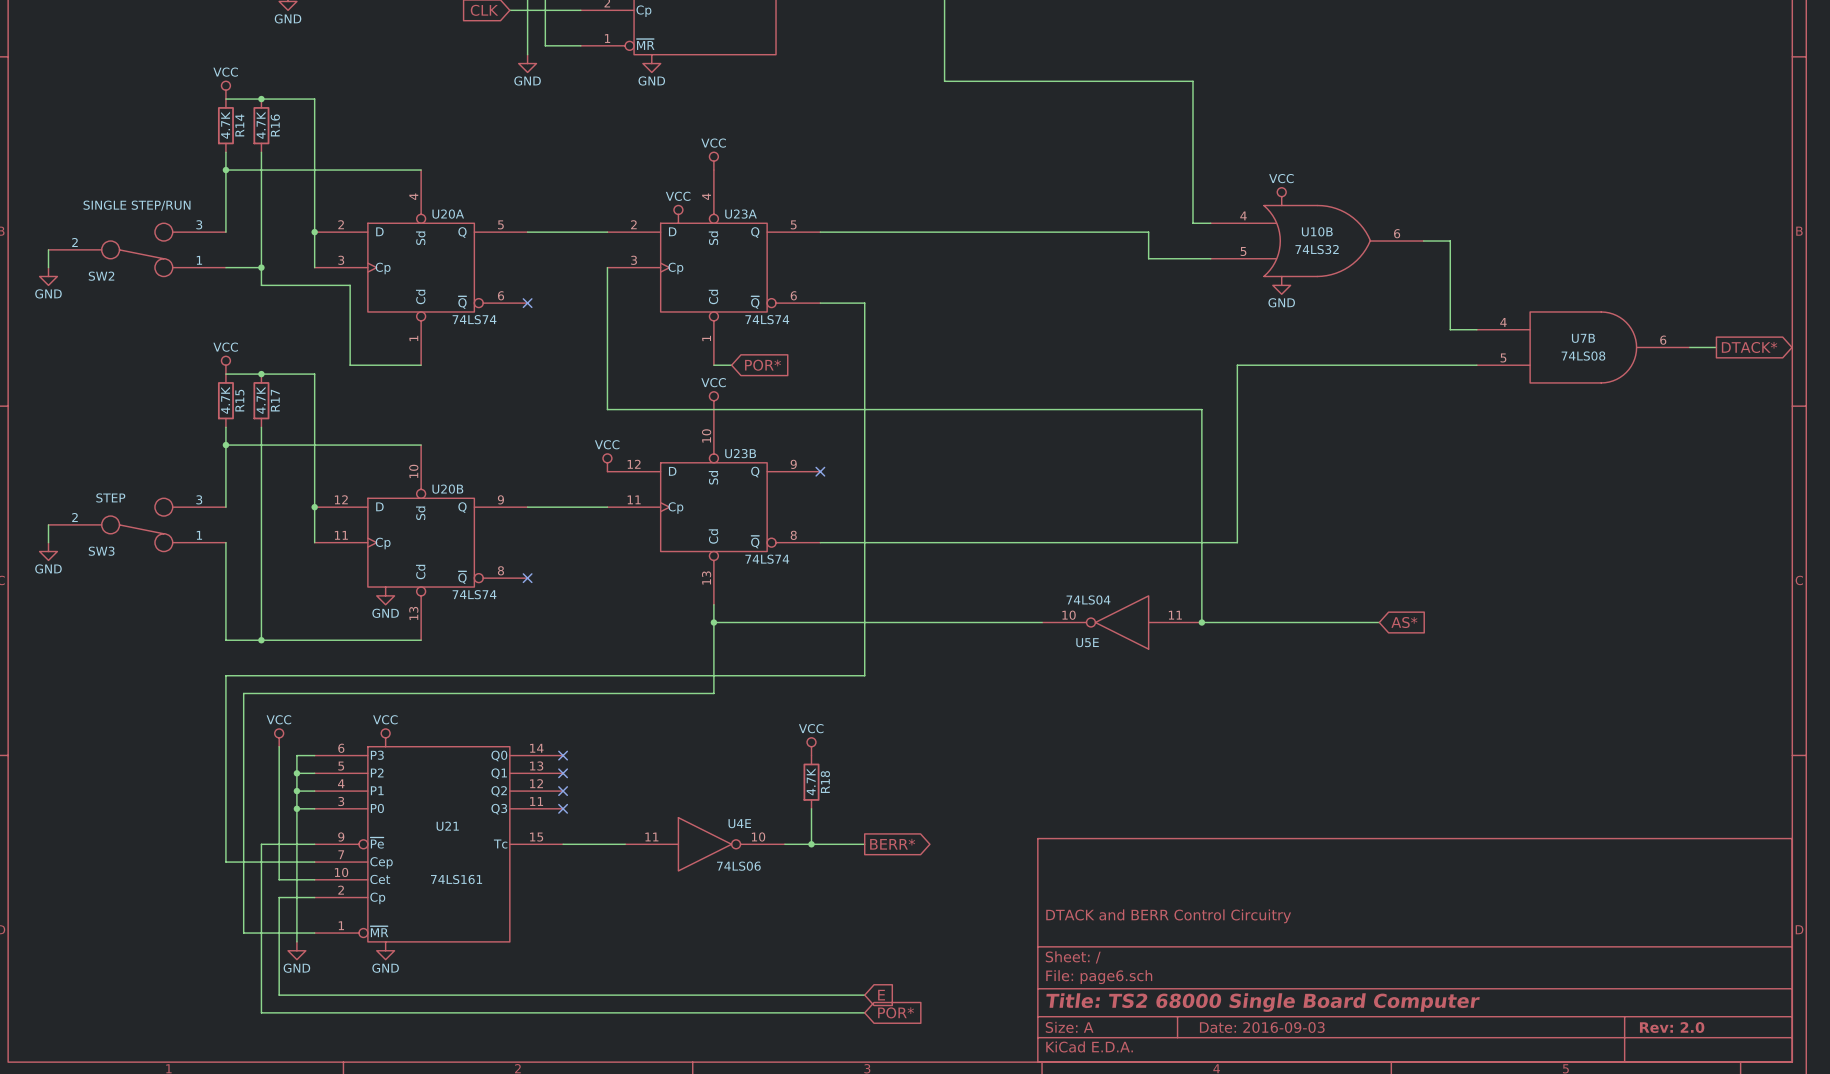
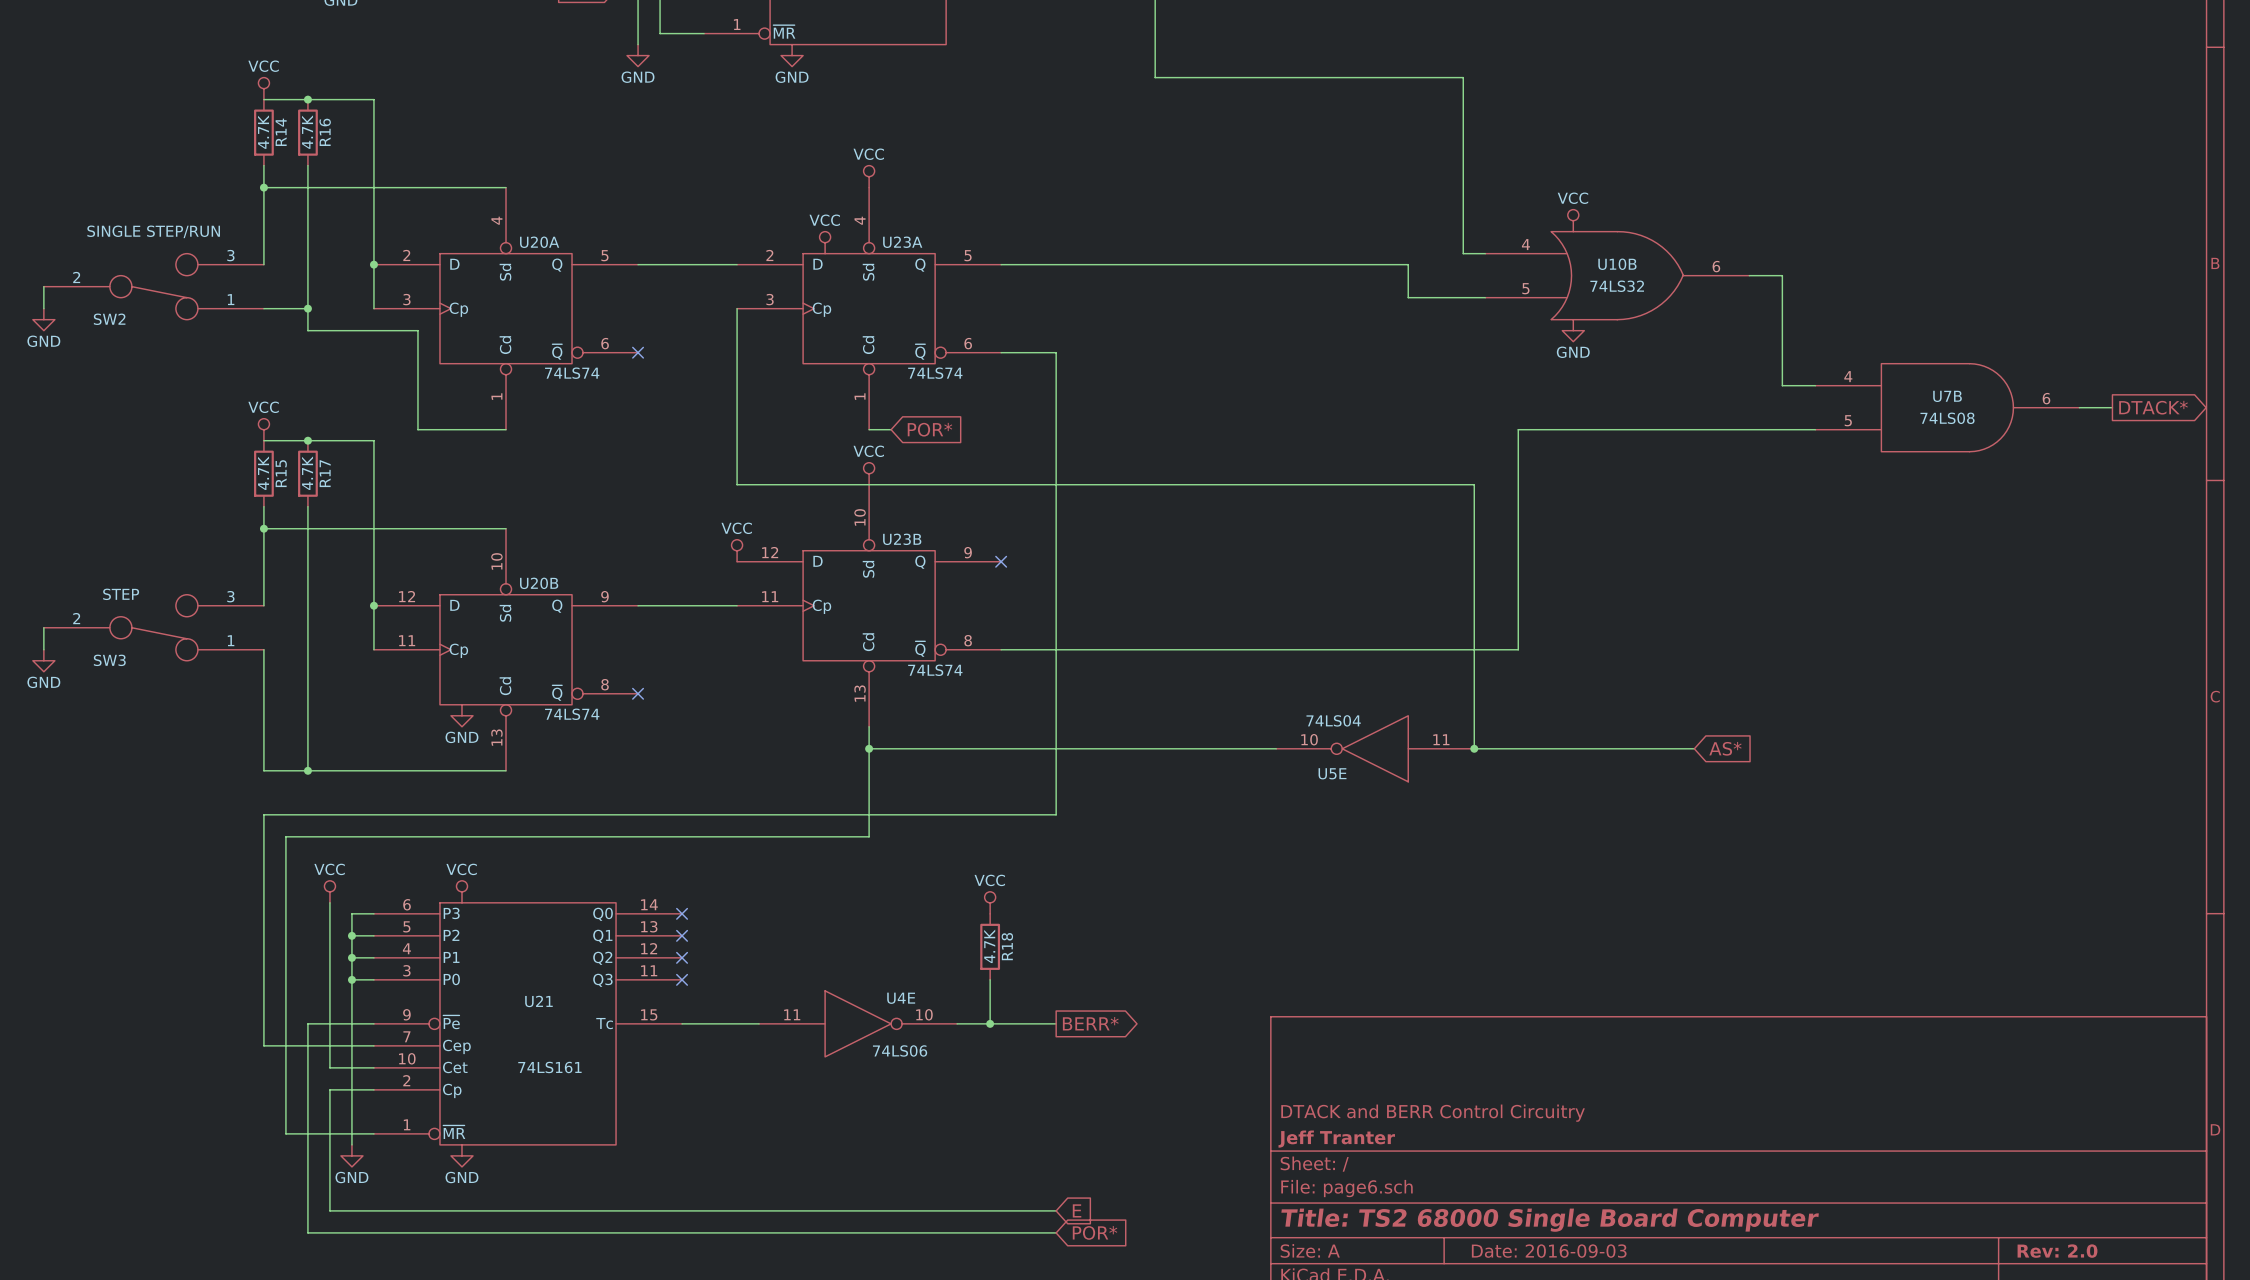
title block: none -> Jeff Tranter (1336, 1139)

